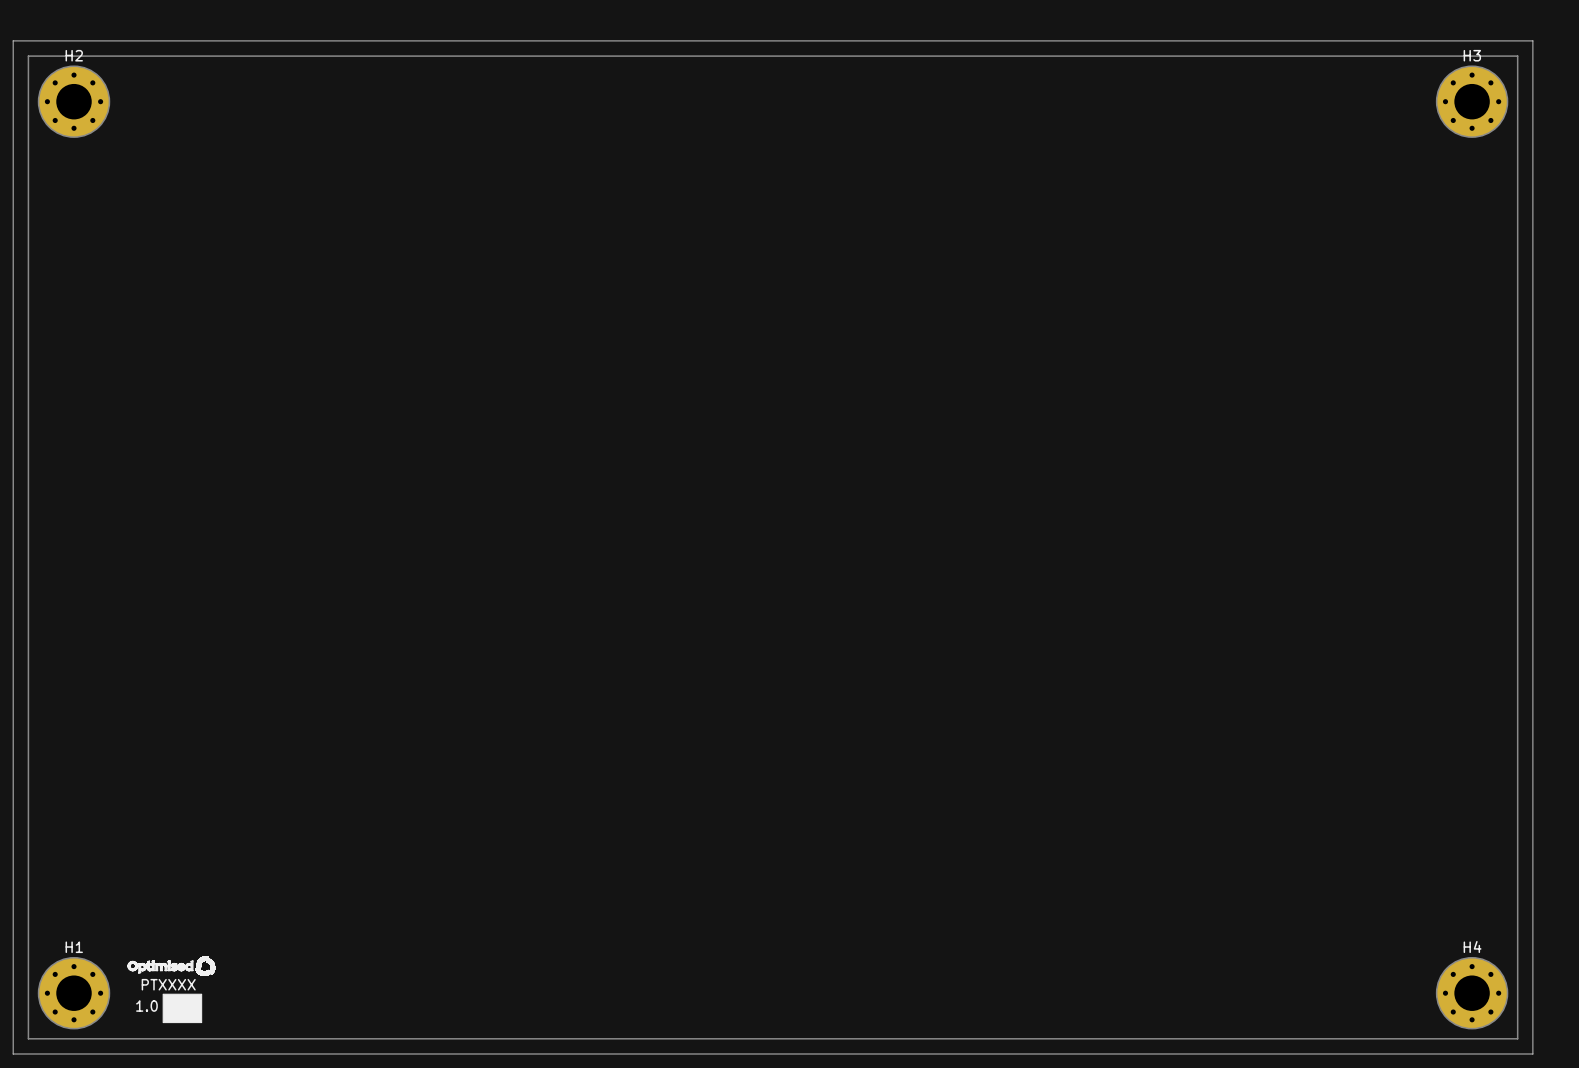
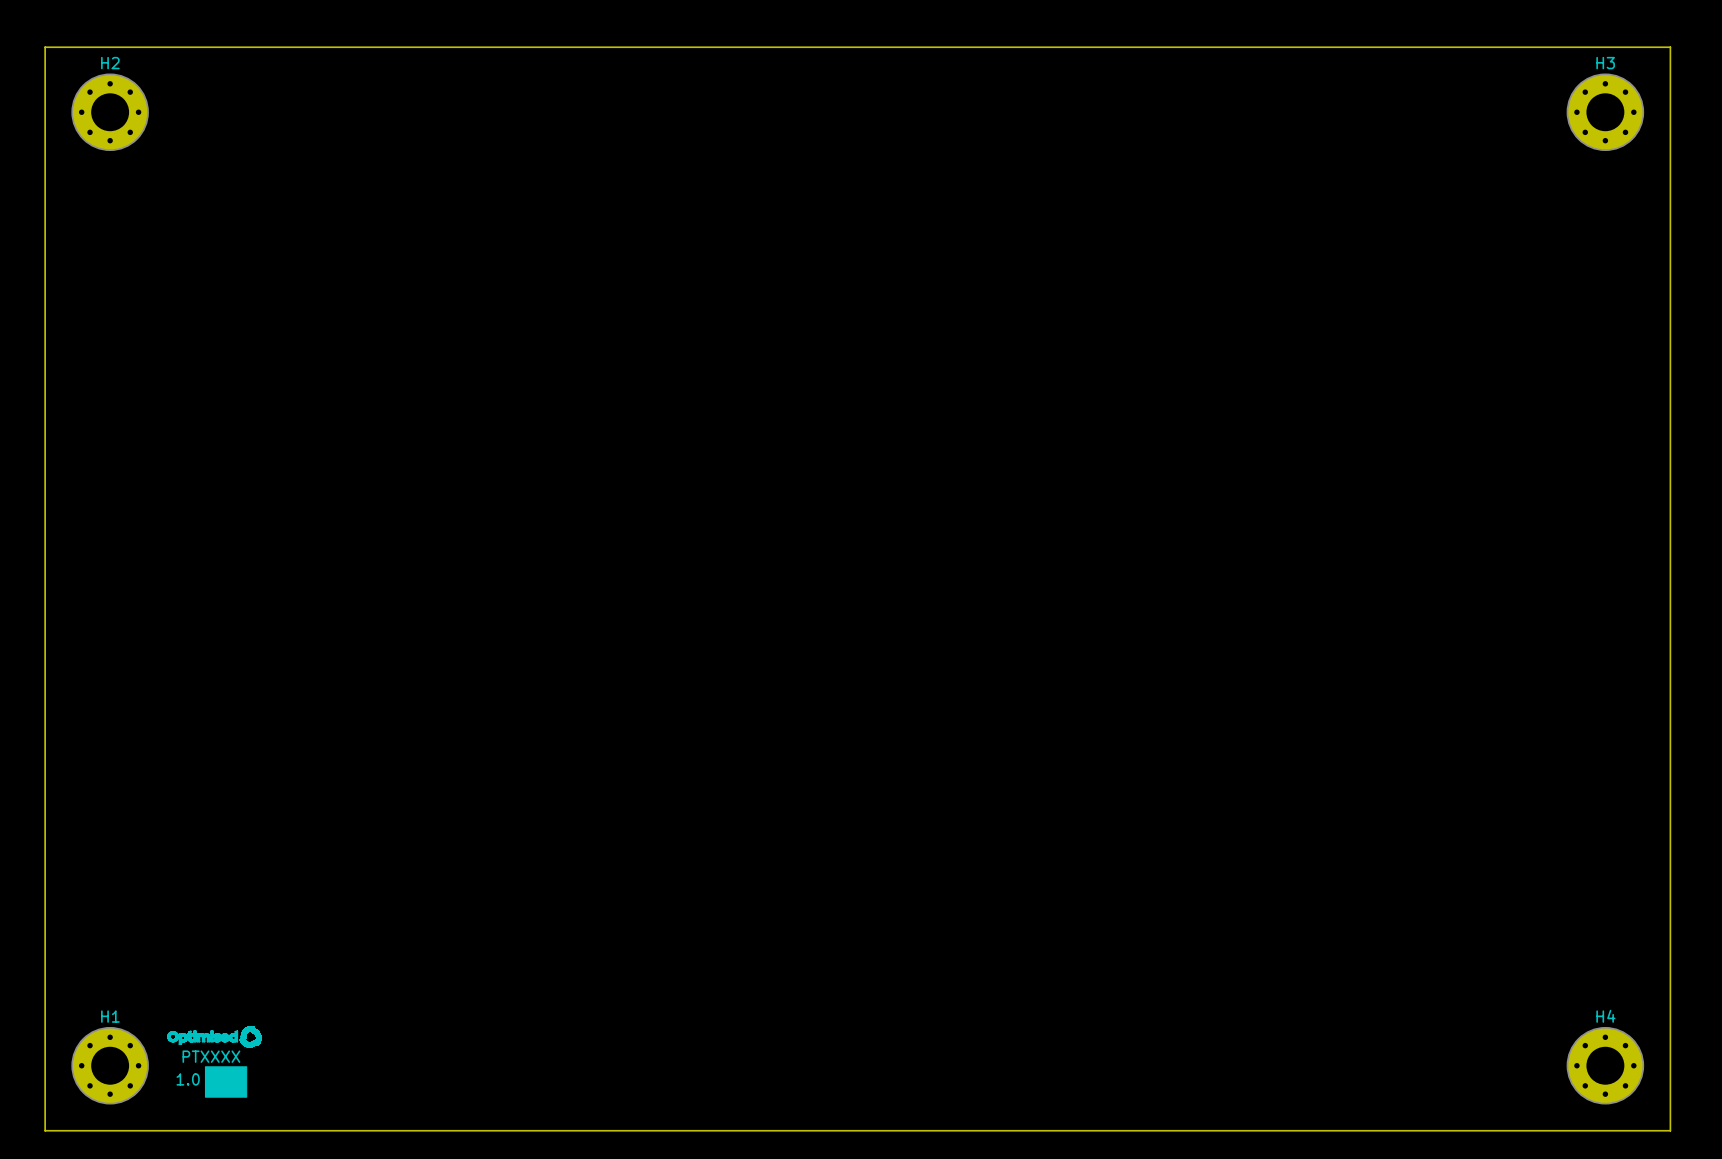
line: (28, 56) (1517, 56) (1517, 1038) (28, 1038) (28, 56) -> none

